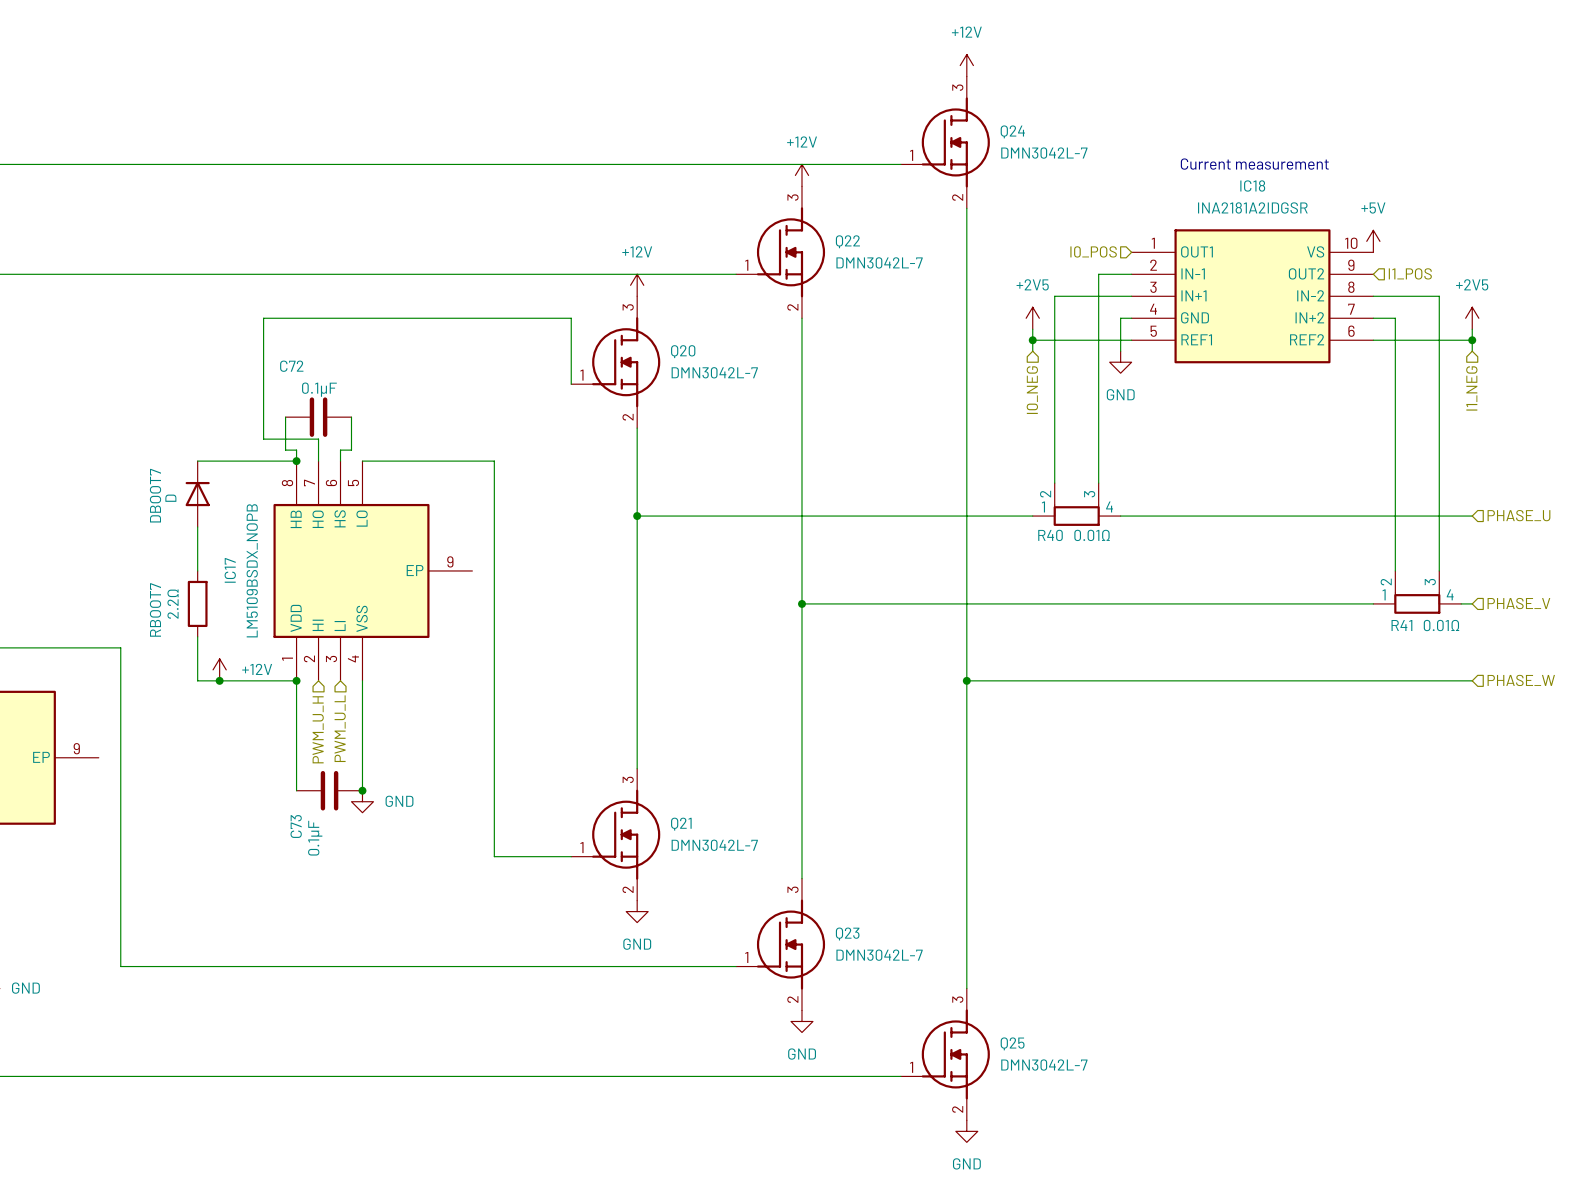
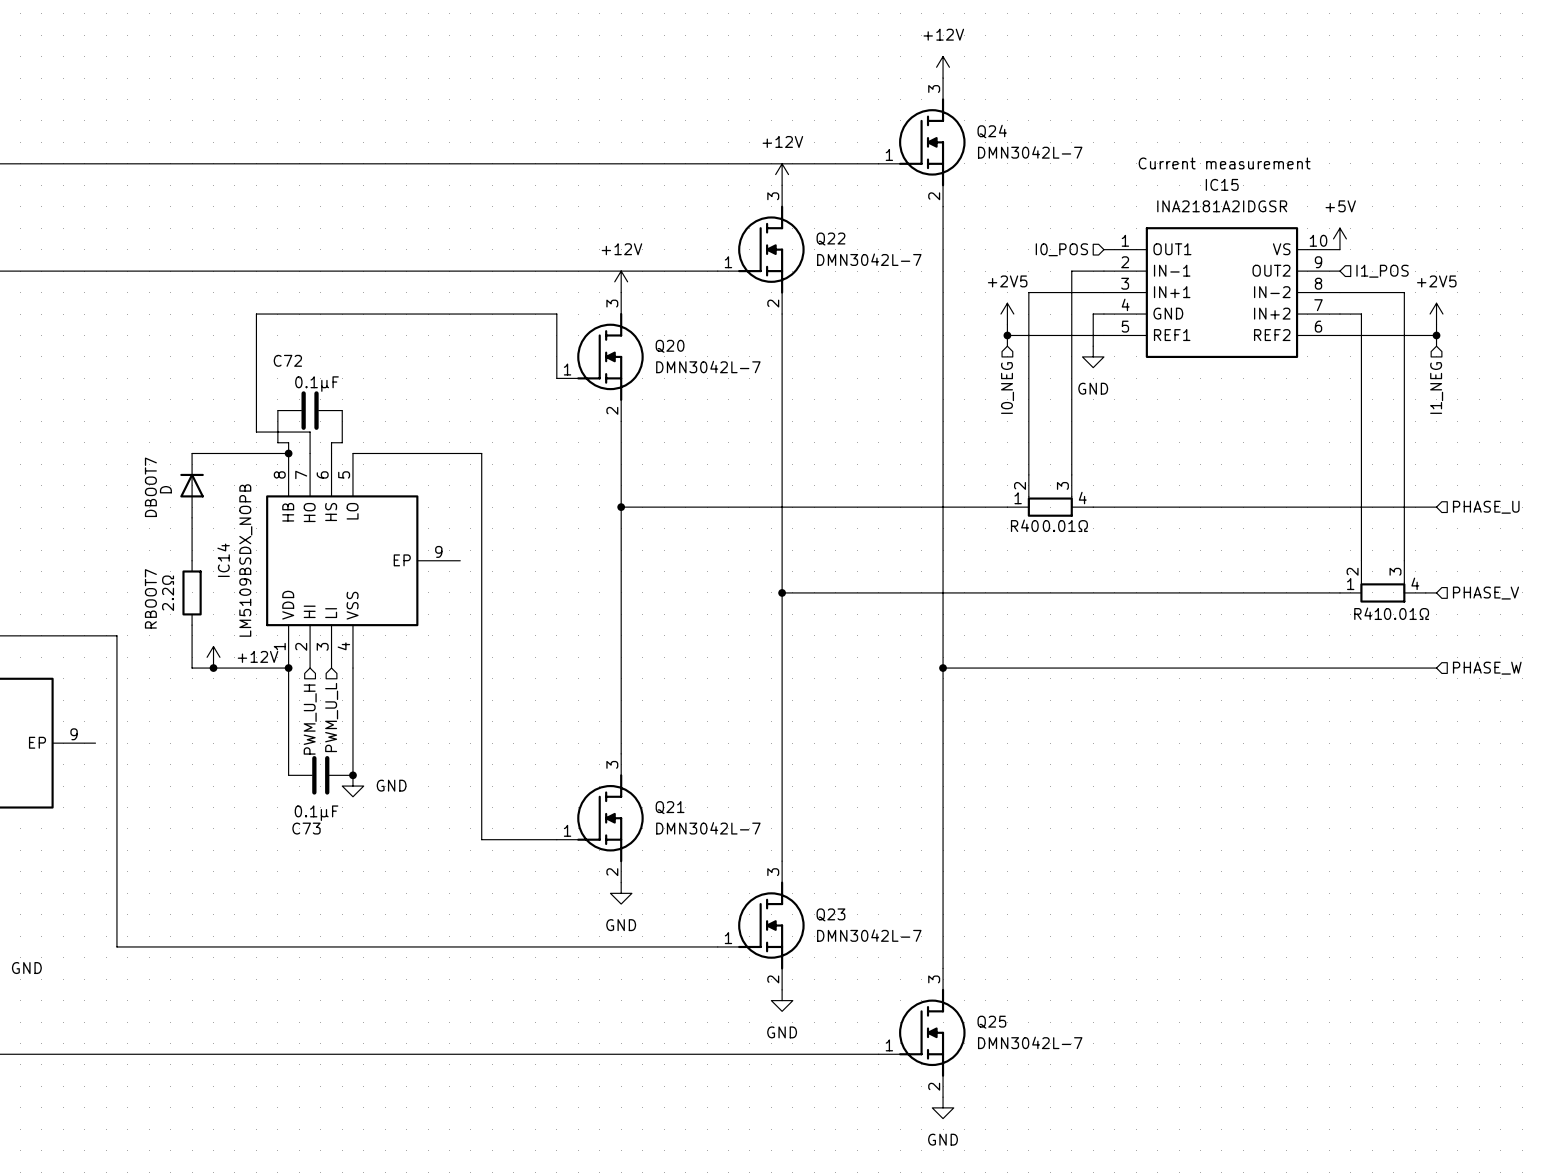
IC18 name: IC18 (1252, 185) -> IC15 (1222, 184)
IC17 name: IC17 (230, 570) -> IC14 (223, 560)
C73 name rotation: 0° (296, 826) -> 90° clockwise (306, 828)
C73 value rotation: 0° (315, 838) -> 90° clockwise (316, 813)

